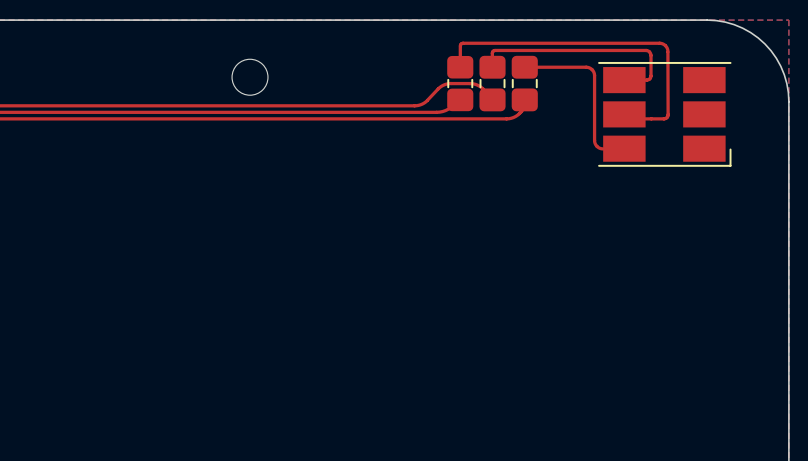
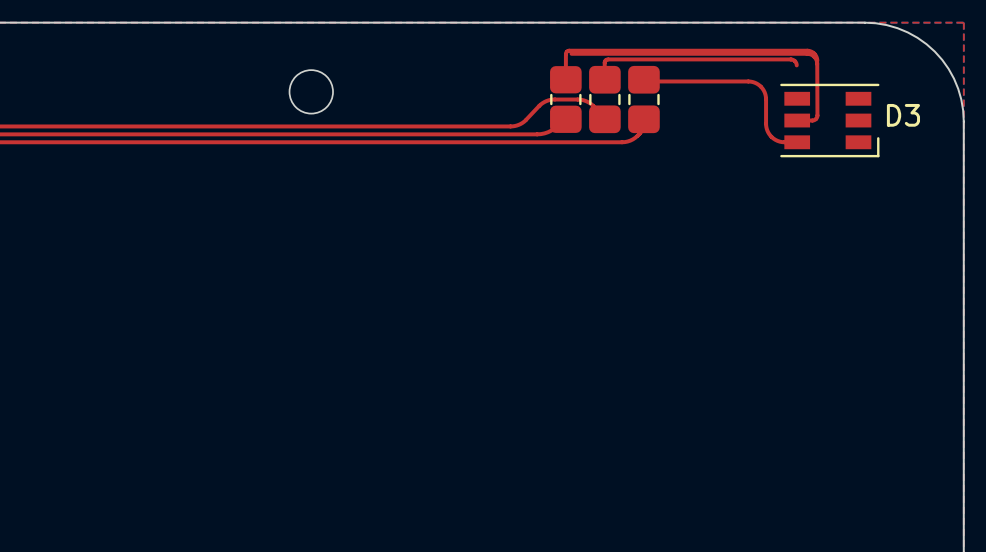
top track: none -> (571, 53) (810, 54) (815, 57) (817, 62) (817, 116) (813, 120) (797, 120)
top track: (667, 52) (668, 115) -> none
top track: (651, 55) (650, 78) (634, 80) -> none
top track: (524, 67) (586, 67) (592, 69) (594, 75) (594, 141) (597, 146) (602, 148) -> none
top track: none -> (643, 81) (748, 81)
top track: none -> (766, 99) (766, 123)
D3: none -> (829, 120)
part: (664, 114) -> none
top track: (668, 114) (665, 118) (651, 118) -> none

